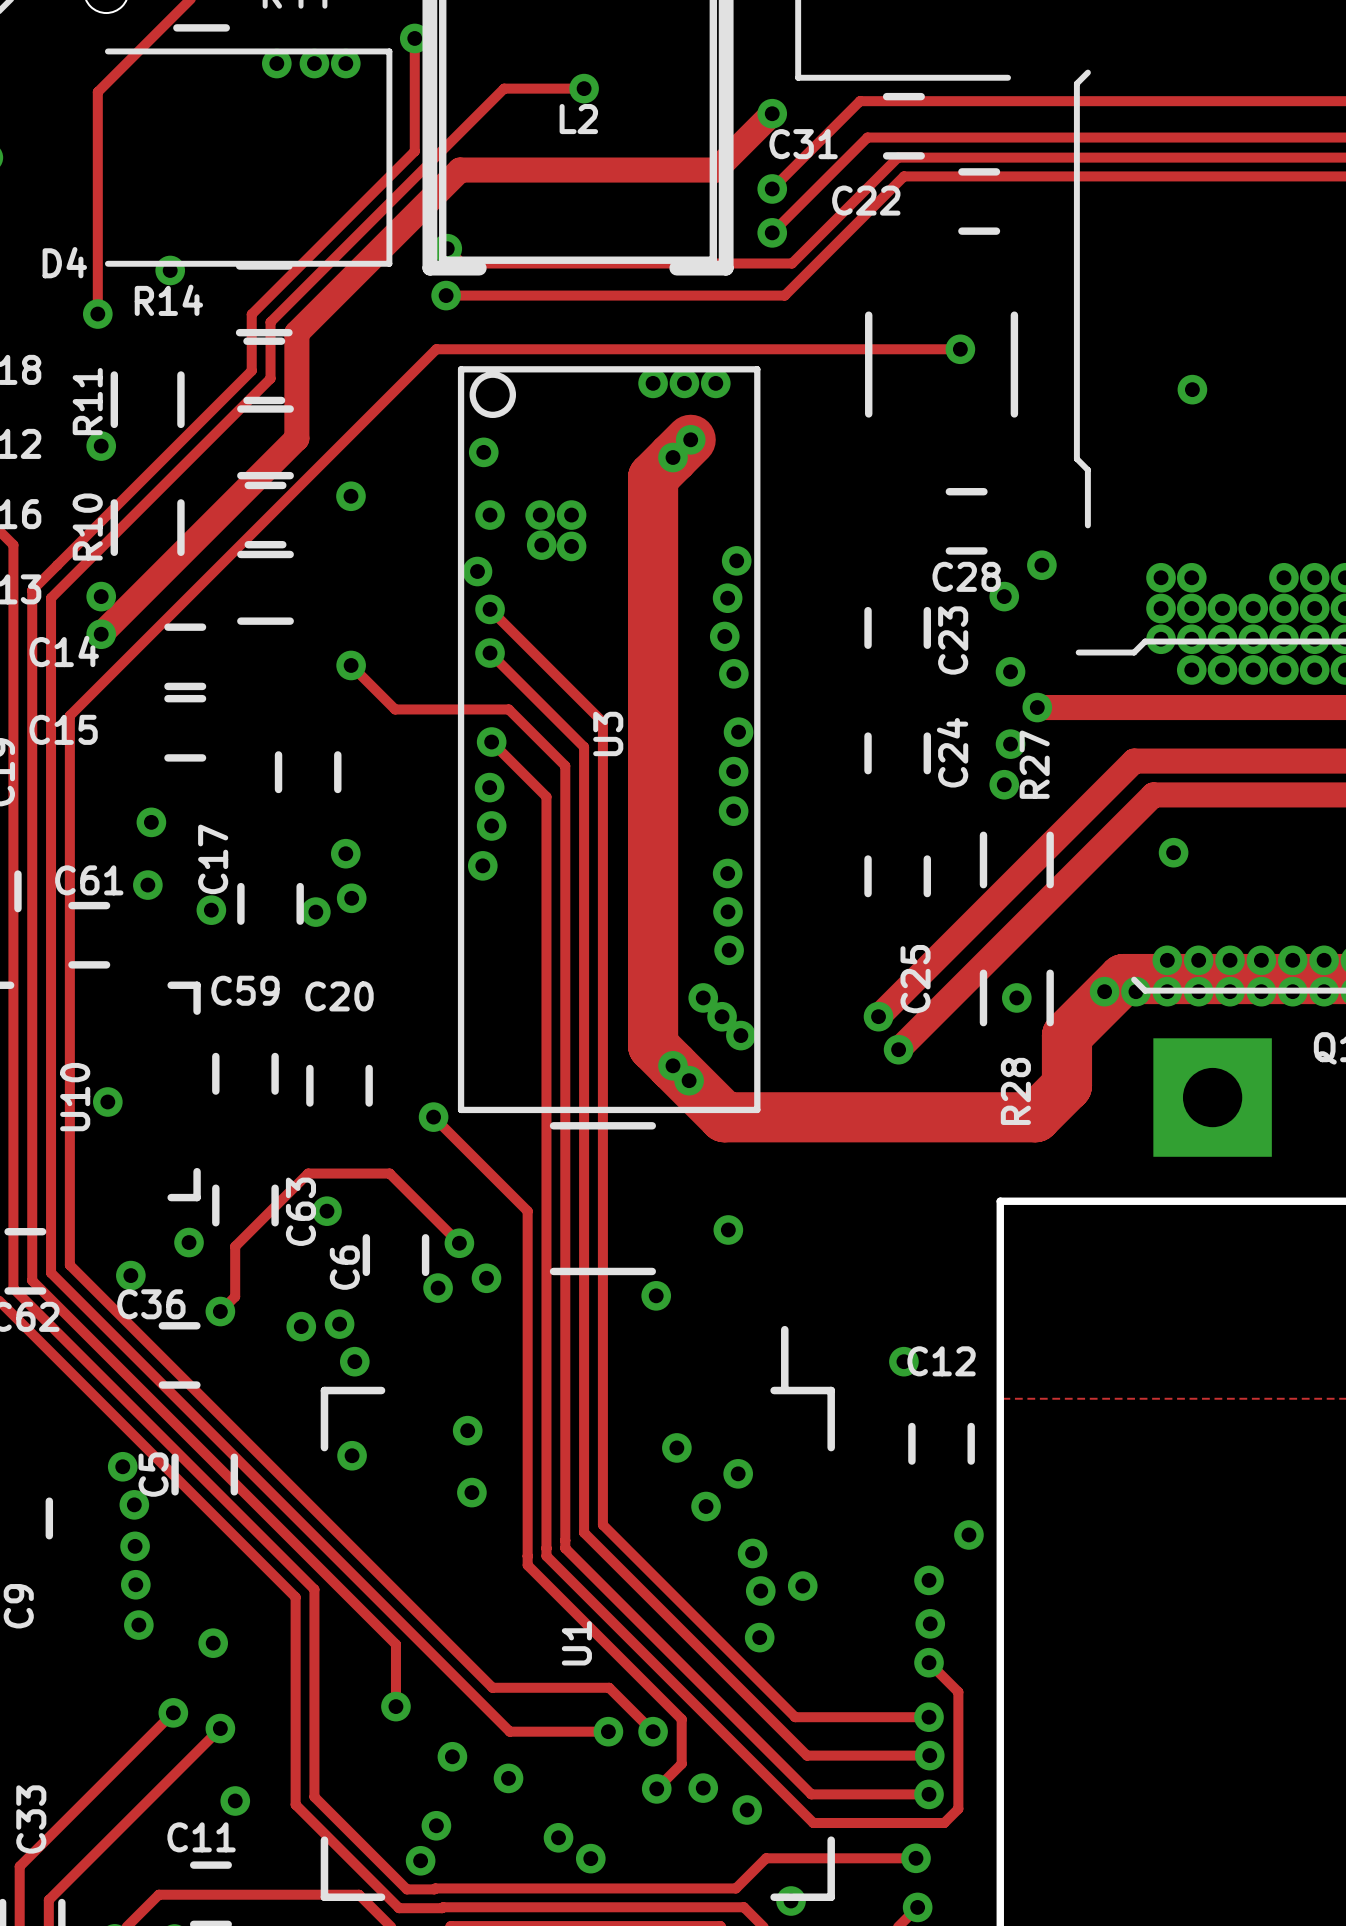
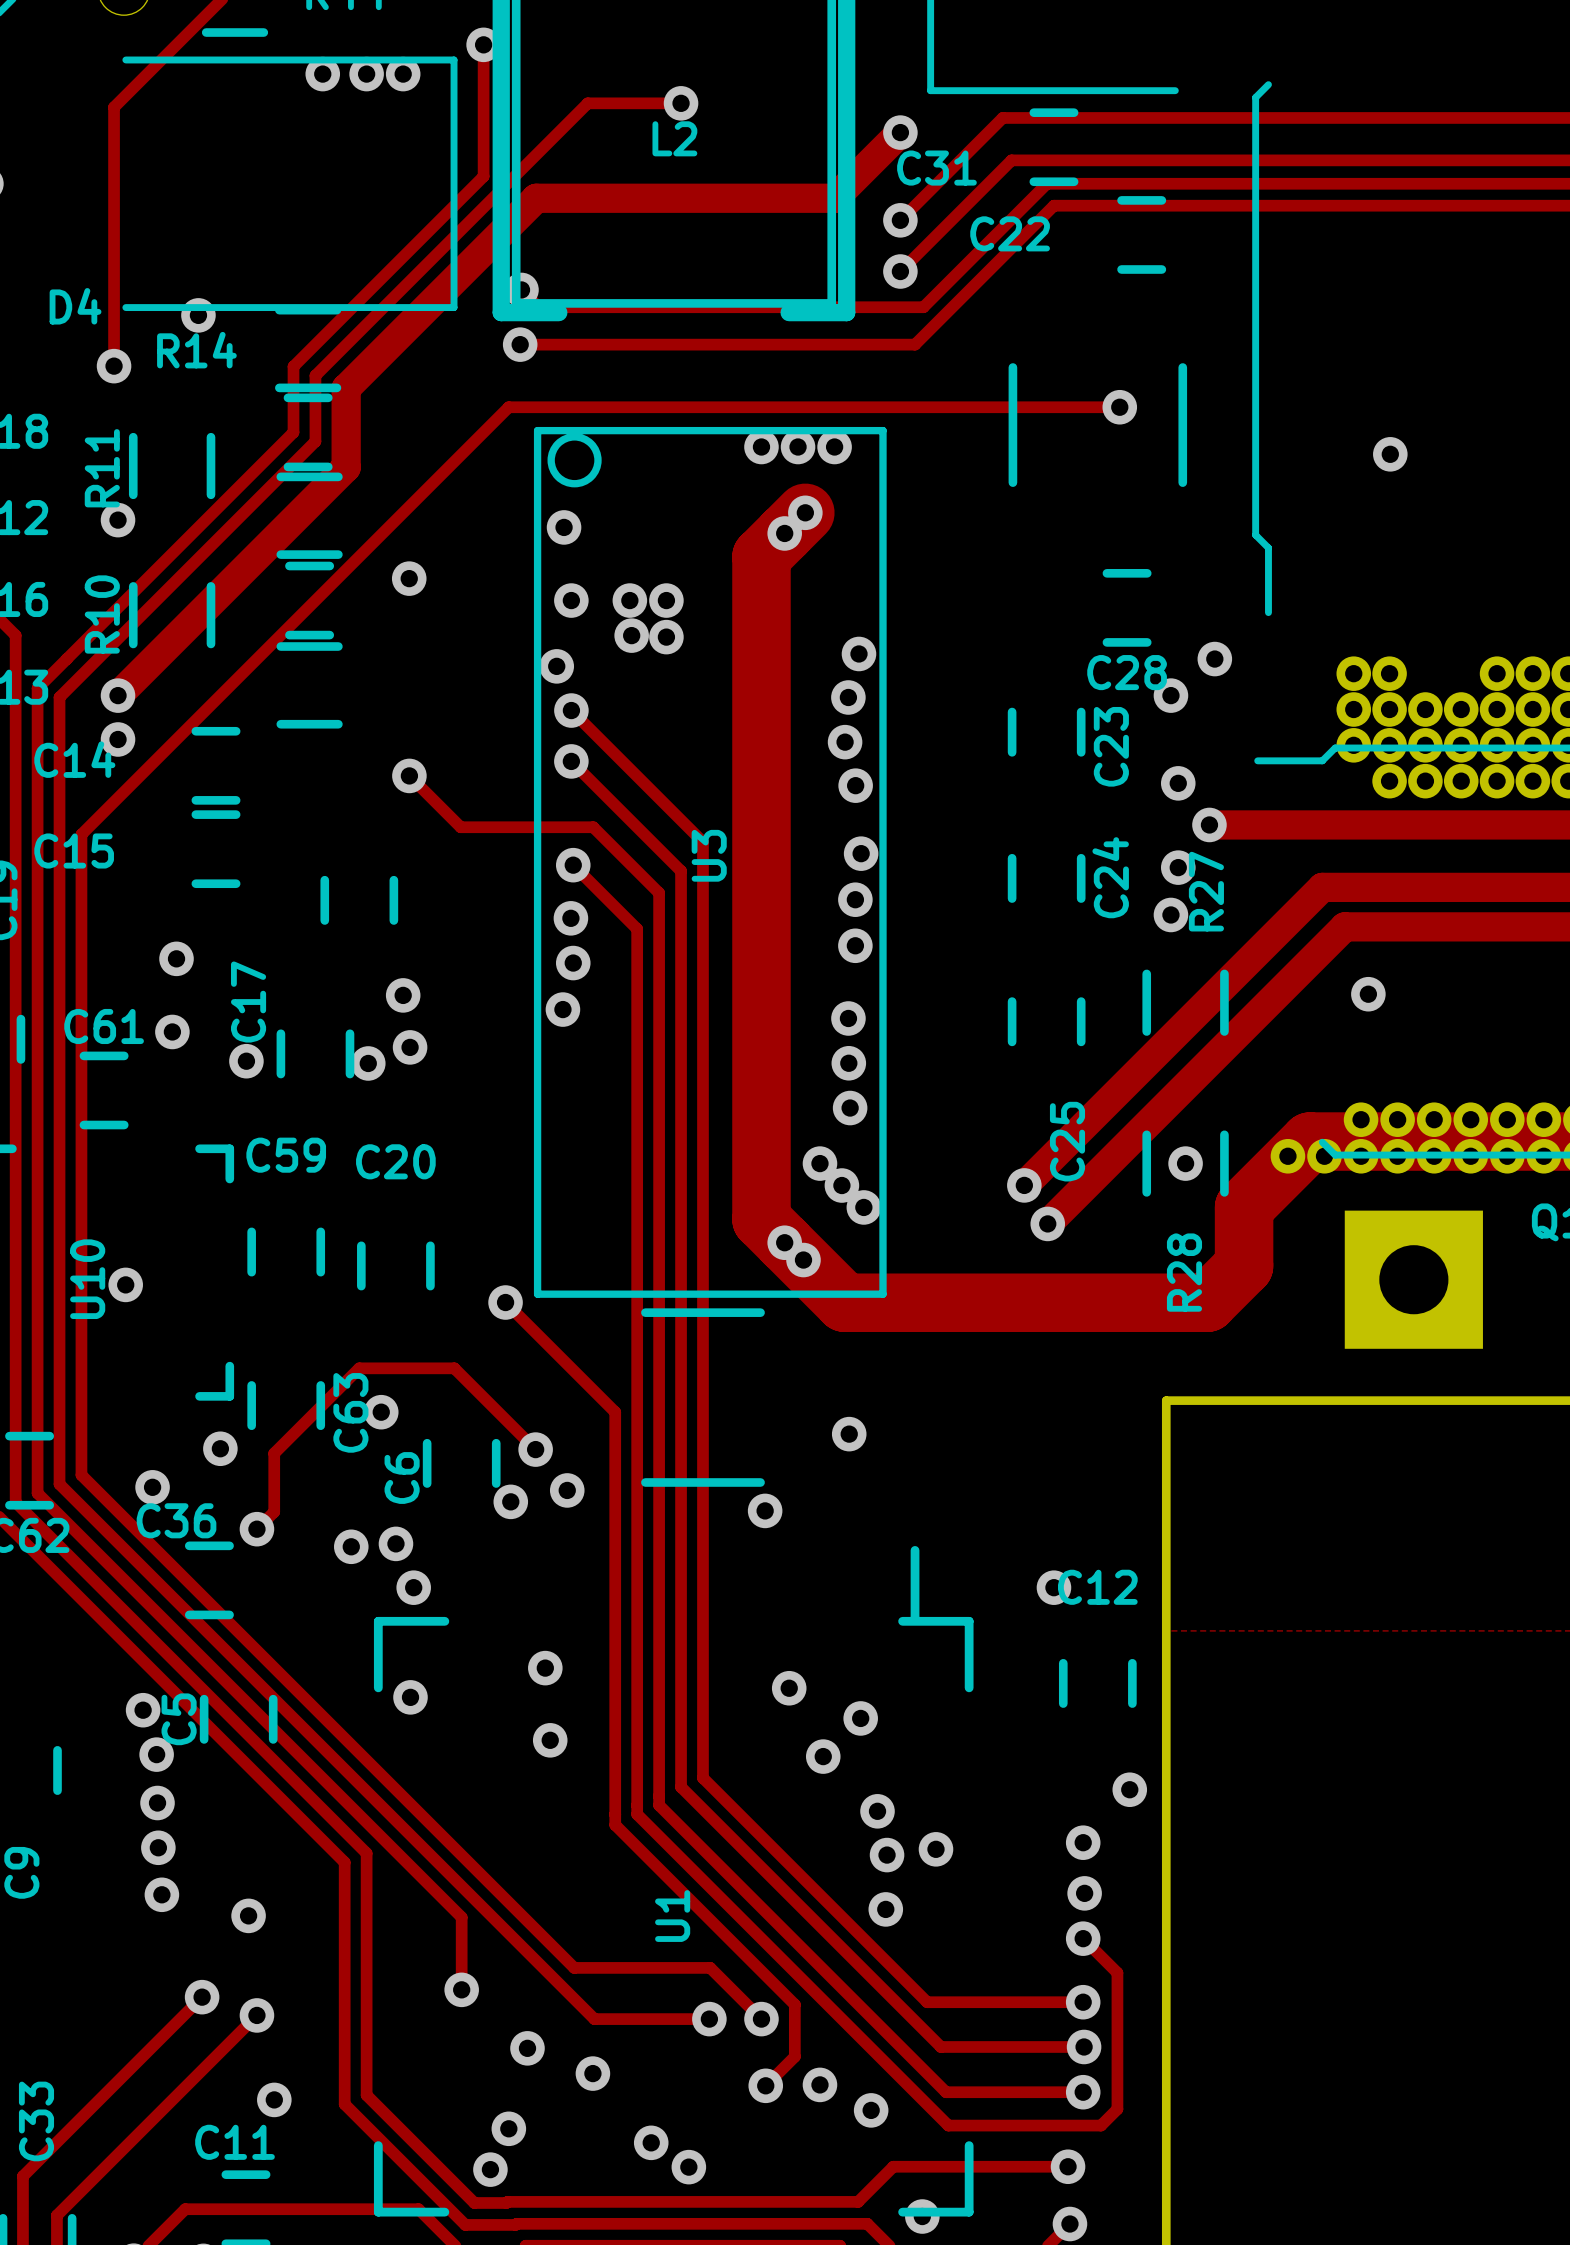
track: (296, 400) (296, 438) (101, 634) -> (346, 467) (118, 695)

